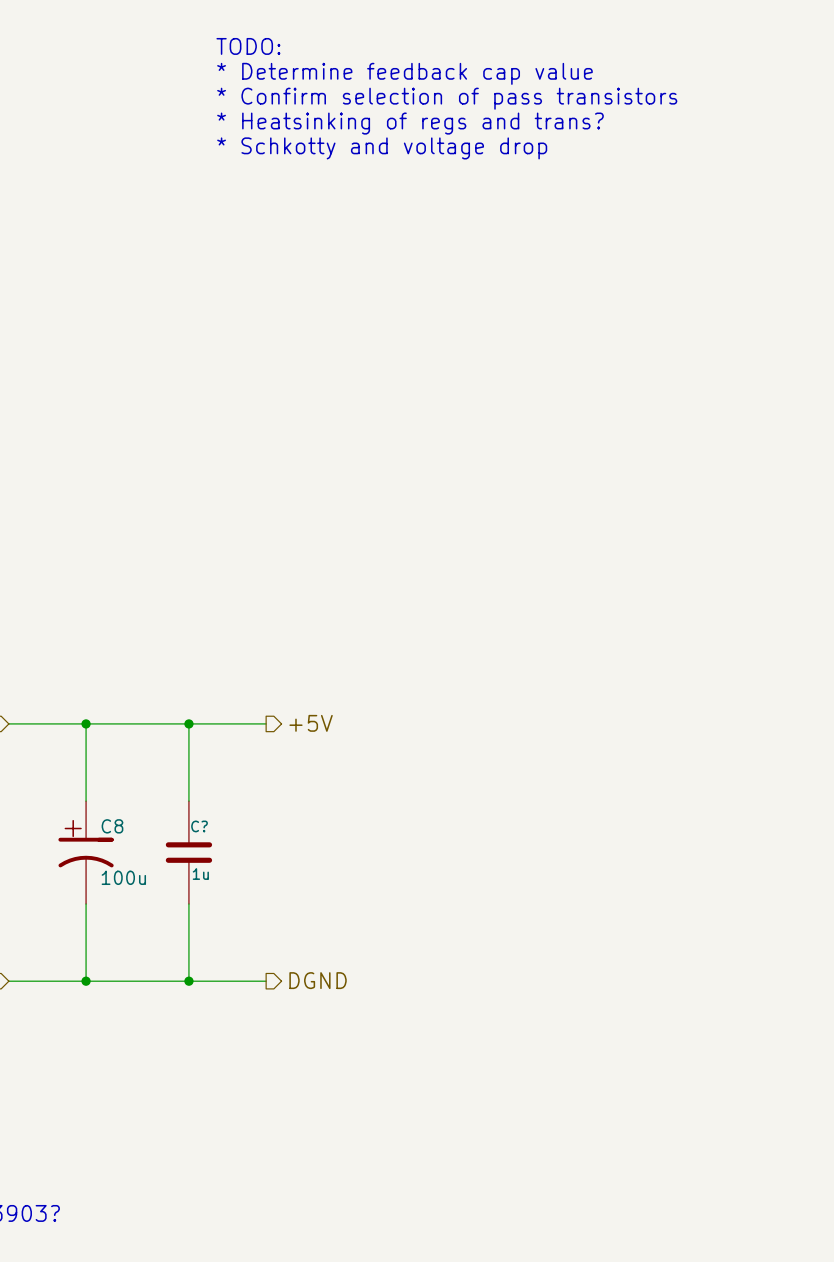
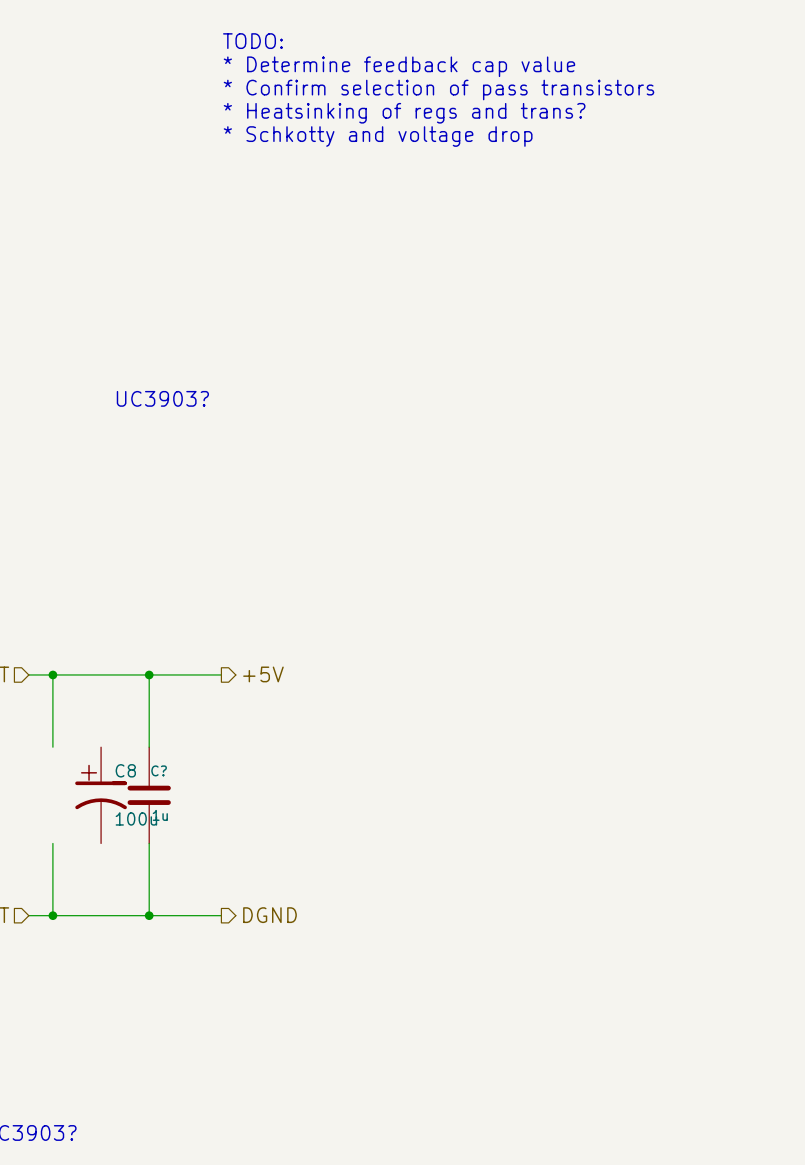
text: none -> UC3903? (162, 398)
junction: none -> (52, 674)
wire: (86, 723) (86, 801) -> (52, 674) (52, 747)
junction: (86, 723) -> none
junction: none -> (149, 674)
wire: (188, 723) (188, 801) -> (149, 674) (149, 747)
junction: (188, 723) -> none
wire: (214, 723) (266, 723) -> none
hierarchical label position: +5V (311, 723) -> +5V (263, 674)
C? position: (188, 852) -> (149, 795)
wire: (86, 904) (86, 981) -> (52, 843) (52, 915)
wire: (188, 904) (188, 981) -> (149, 843) (149, 915)
hierarchical label position: DGND (318, 980) -> DGND (269, 915)
junction: none -> (52, 915)
junction: (86, 981) -> none
junction: none -> (149, 915)
junction: (188, 981) -> none
wire: (214, 981) (266, 981) -> none

